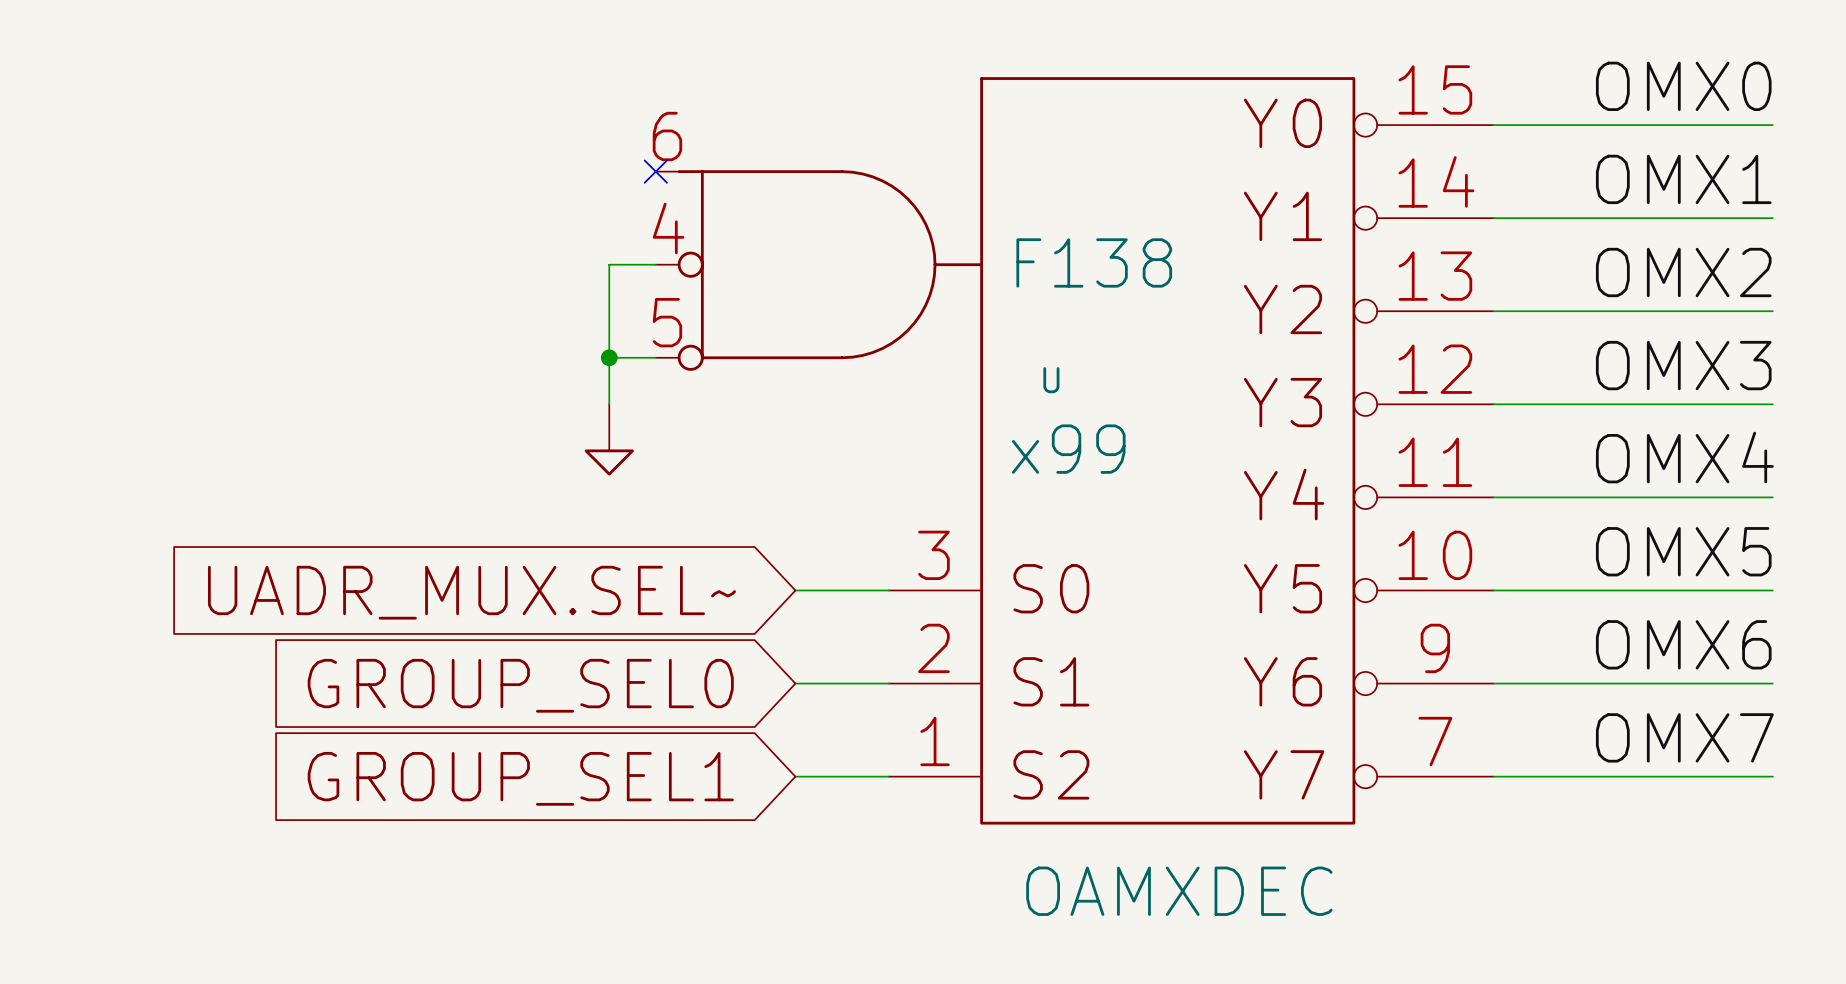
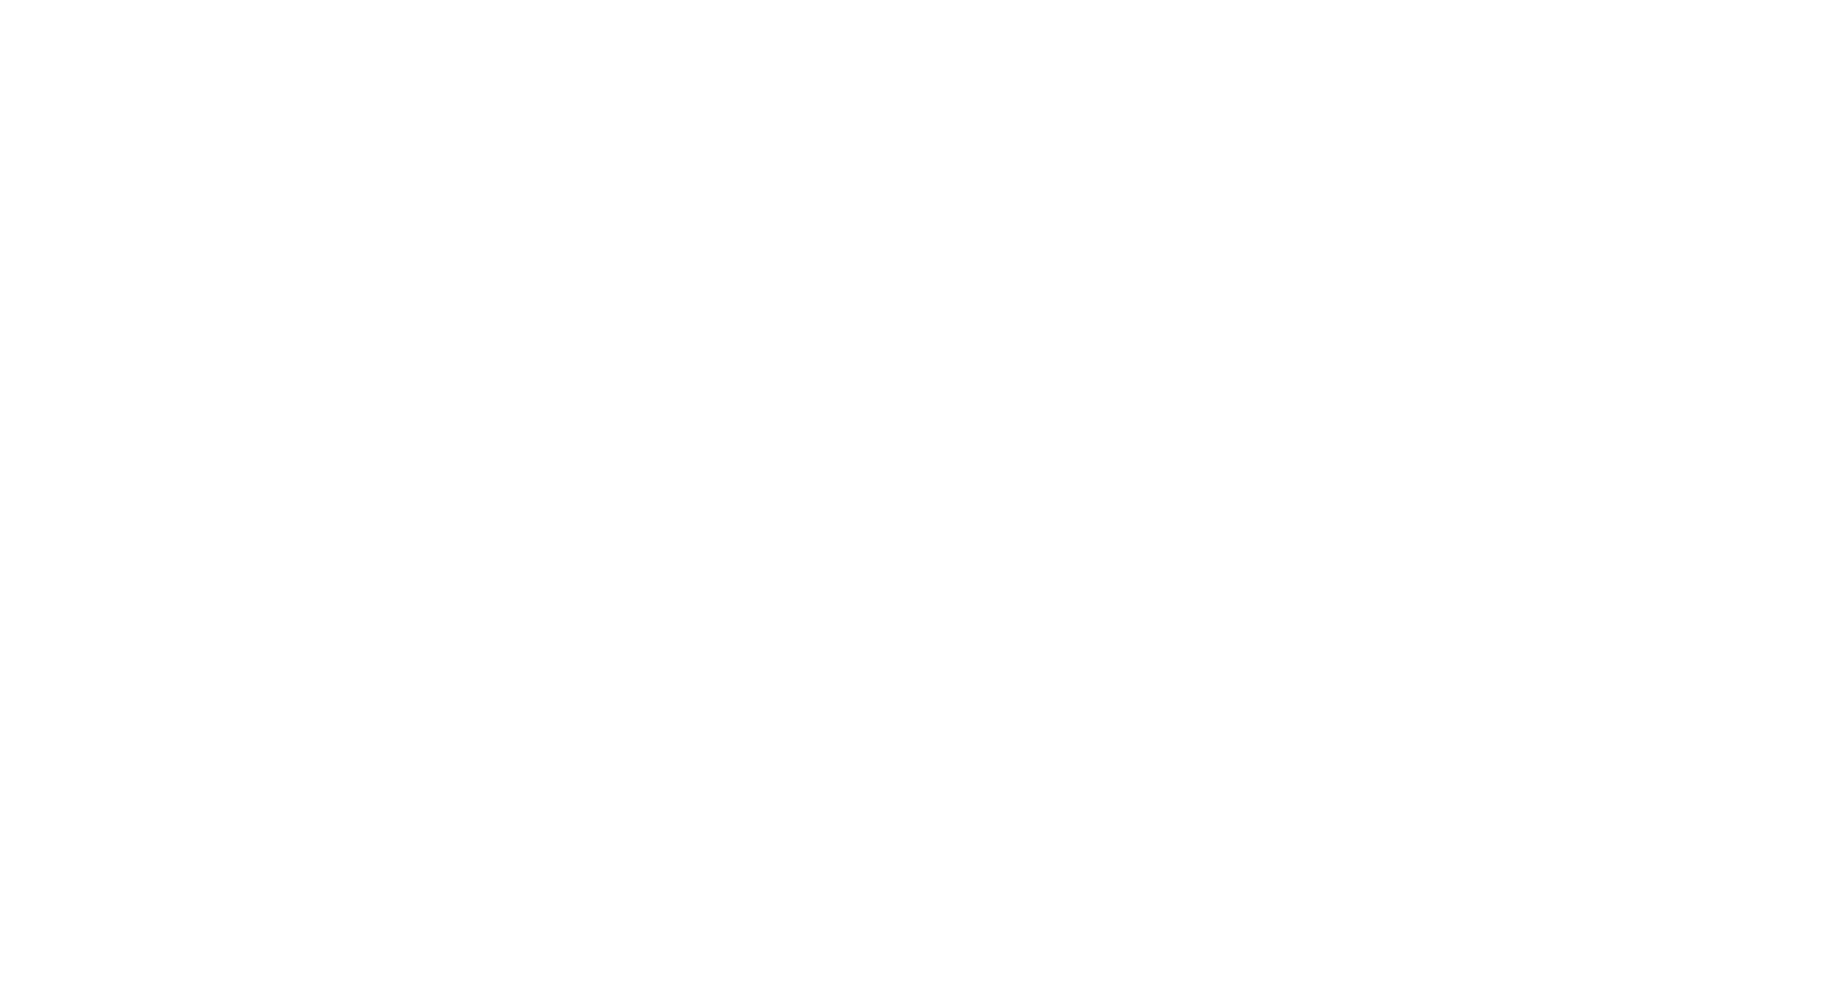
label: OMX0 (1683, 86) -> none
wire: (1493, 125) (1772, 125) -> none
no-connect mark: (655, 171) -> none
label: OMX1 (1683, 179) -> none
wire: (1493, 218) (1772, 218) -> none
wire: (655, 264) (609, 264) (609, 404) -> none
label: OMX2 (1683, 272) -> none
wire: (1493, 311) (1772, 311) -> none
wire: (609, 357) (655, 357) -> none
junction: (609, 357) -> none
label: OMX3 (1683, 365) -> none
wire: (1493, 404) (1772, 404) -> none
power symbol: (609, 439) -> none
U: F138 (1074, 450) -> none
label: OMX4 (1684, 457) -> none
wire: (1493, 497) (1772, 497) -> none
label: OMX5 (1683, 551) -> none
wire: (795, 590) (888, 590) -> none
wire: (1493, 590) (1772, 590) -> none
global label: UADR_MUX.SEL~ (471, 592) -> none
label: OMX6 (1683, 644) -> none
wire: (795, 683) (888, 683) -> none
wire: (1493, 683) (1772, 683) -> none
global label: GROUP_SEL0 (520, 685) -> none
label: OMX7 (1684, 737) -> none
wire: (795, 776) (888, 776) -> none
wire: (1493, 776) (1772, 776) -> none
global label: GROUP_SEL1 (520, 778) -> none

